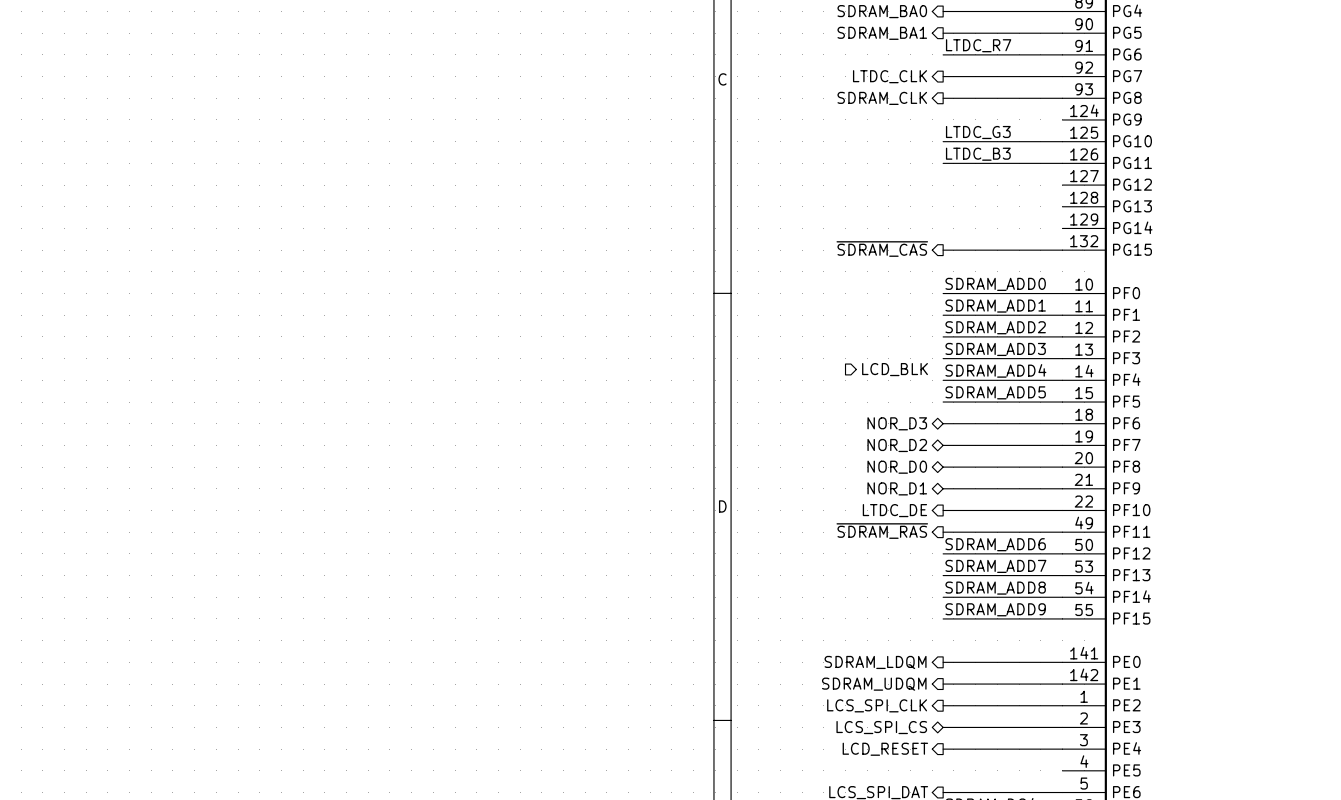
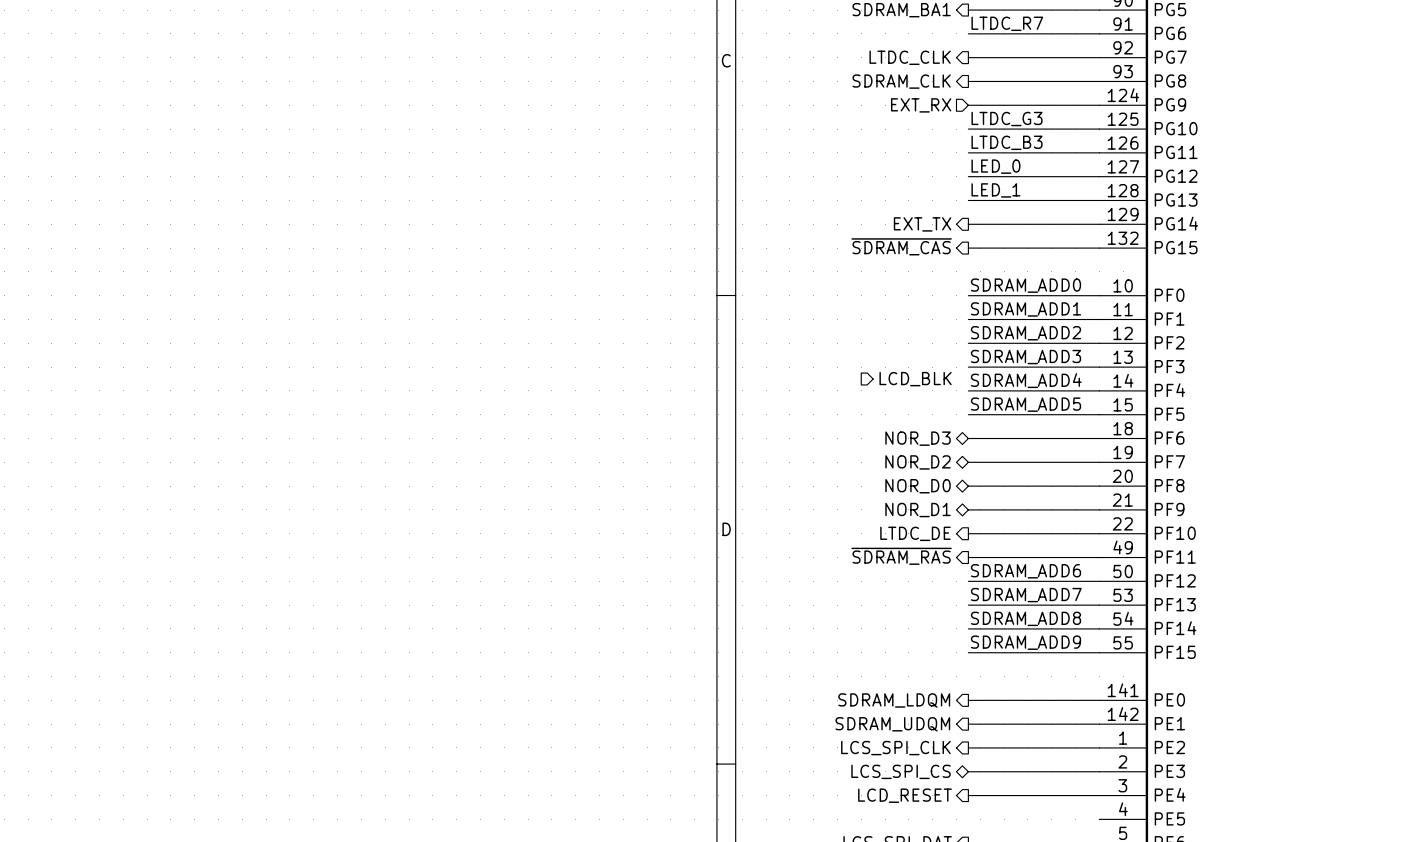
wire: none -> (968, 105) (1099, 105)
hierarchical label: none -> EXT_RX (921, 105)
label: none -> LED_0 (995, 166)
wire: none -> (968, 176) (1099, 176)
label: none -> LED_1 (995, 190)
wire: none -> (968, 200) (1099, 200)
hierarchical label: none -> EXT_TX (922, 224)
wire: none -> (968, 224) (1099, 224)

